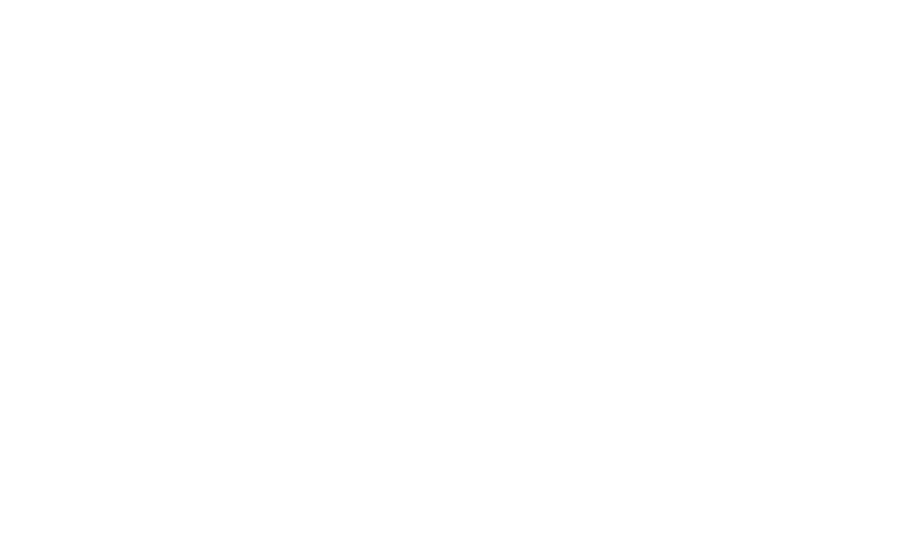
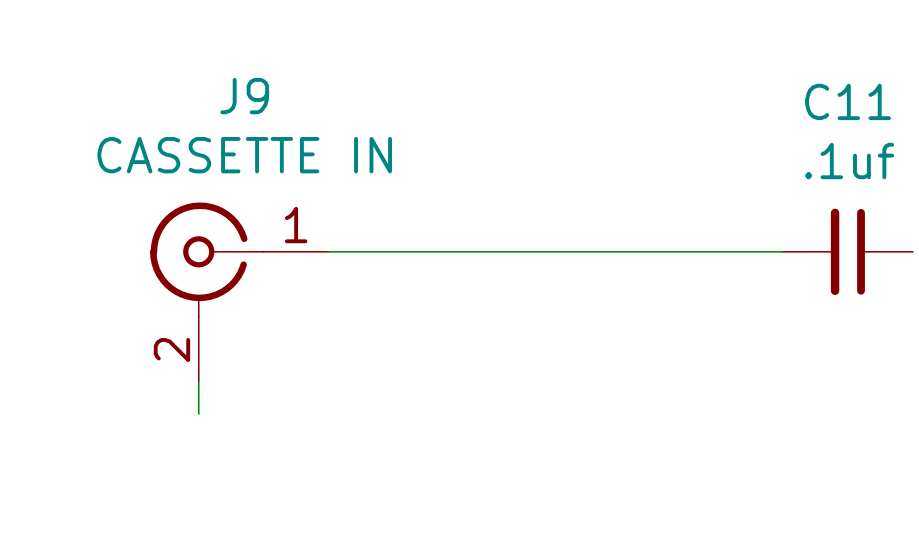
wire: none -> (328, 251) (783, 251)
C11: none -> .1uf (848, 251)
J9: none -> CASSETTE IN (239, 292)
wire: none -> (198, 381) (198, 414)

